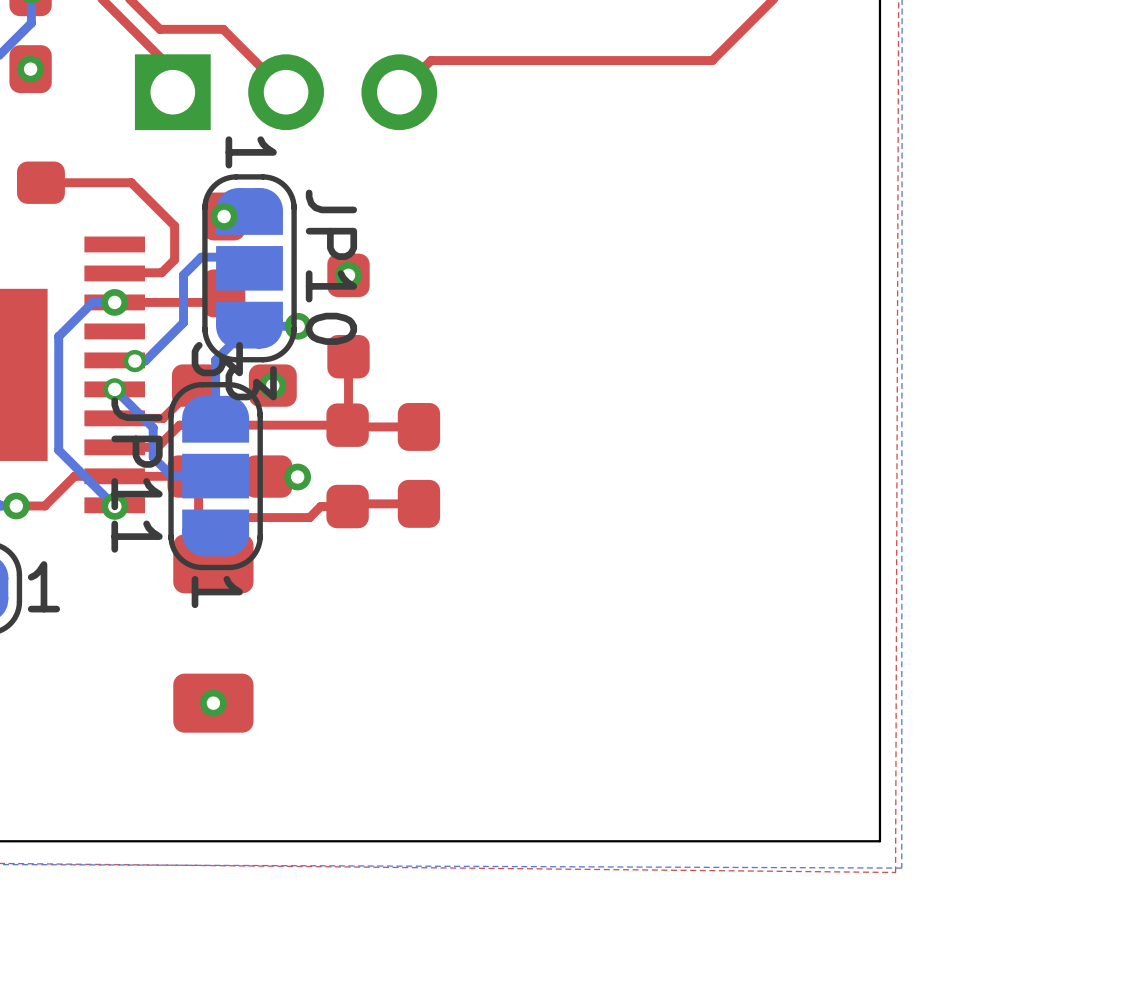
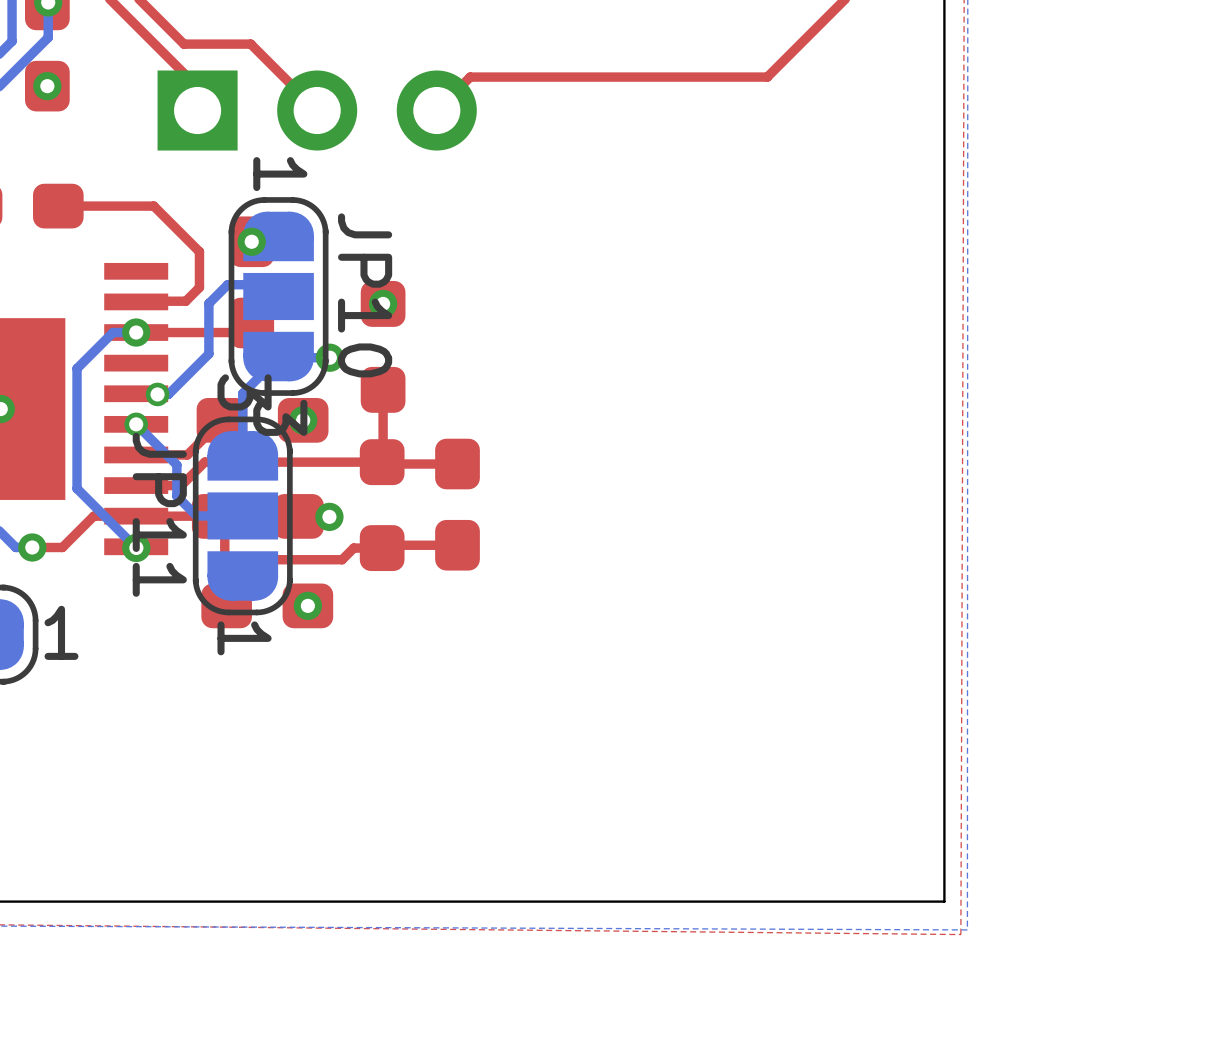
part: none -> (267, 605)
part: (213, 633) -> none
via position: (213, 703) -> (307, 605)

